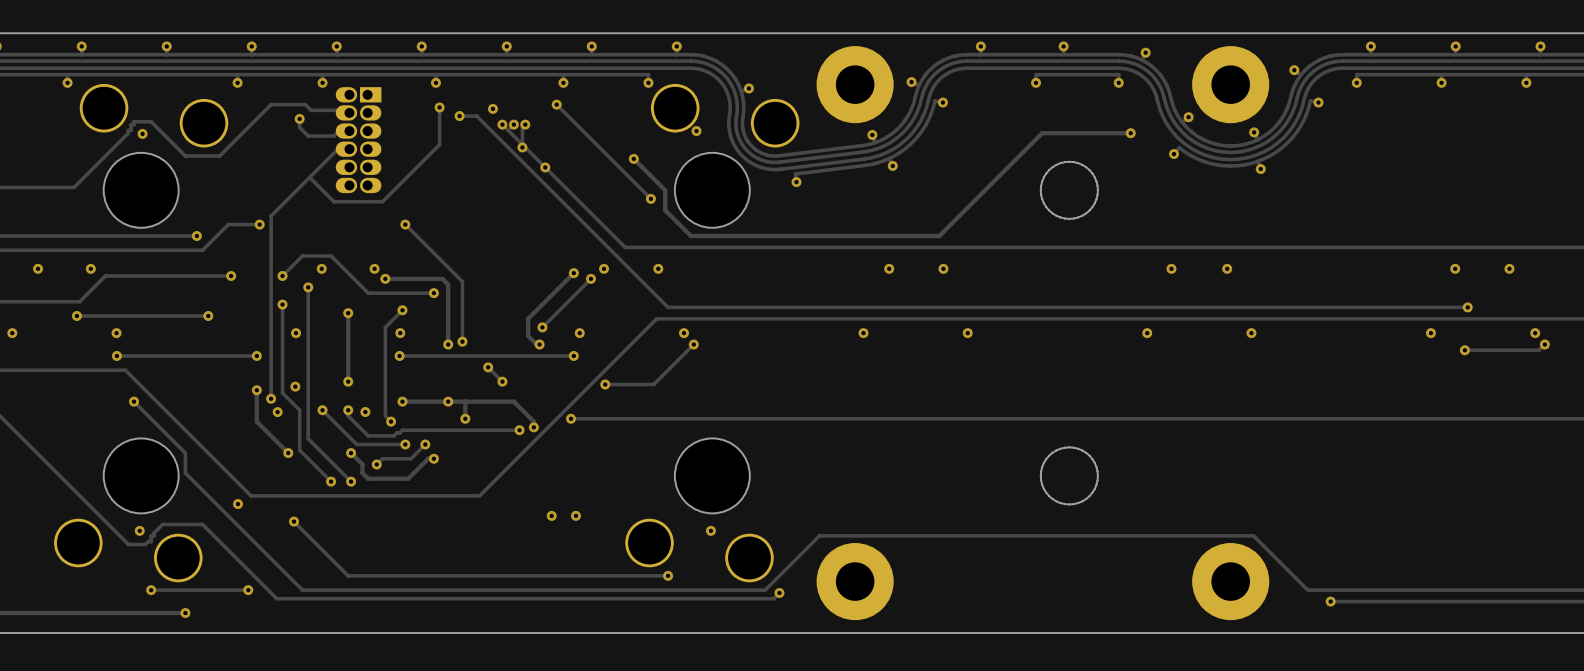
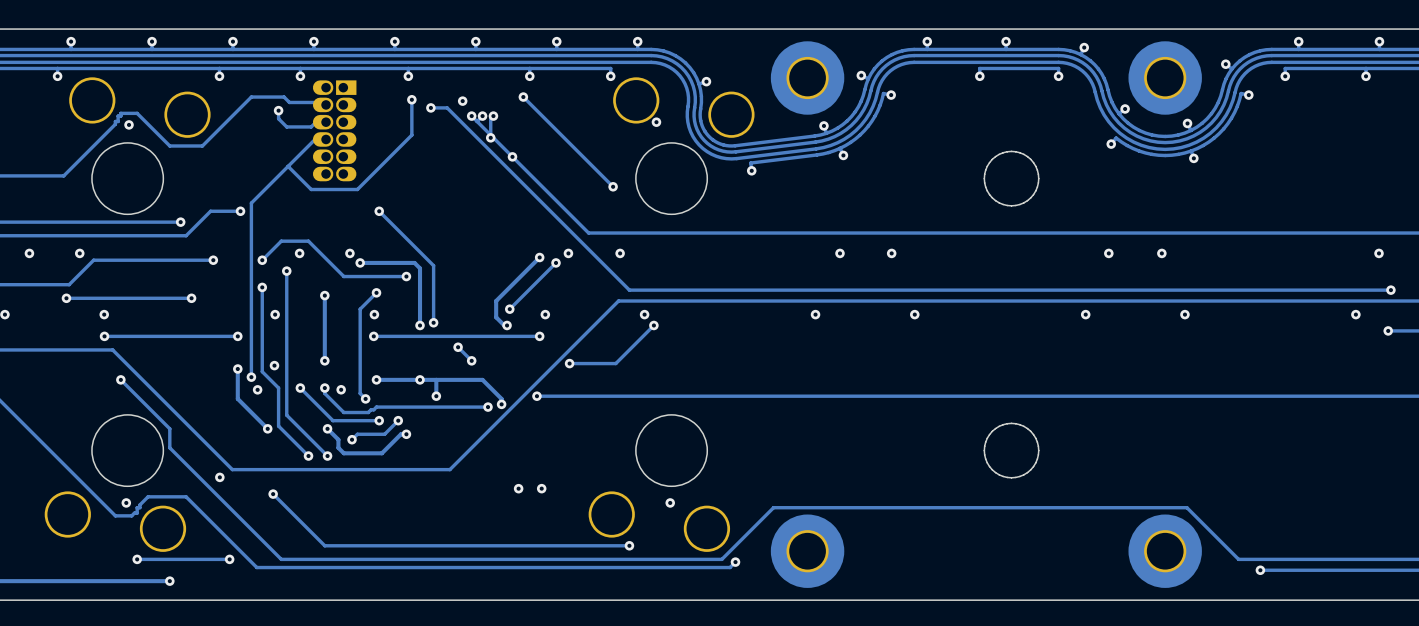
track: (1130, 133) (1042, 133) (939, 236) (690, 236) (665, 210) (665, 190) (633, 158) -> none
via: (1130, 133) -> none
via: (633, 158) -> none

